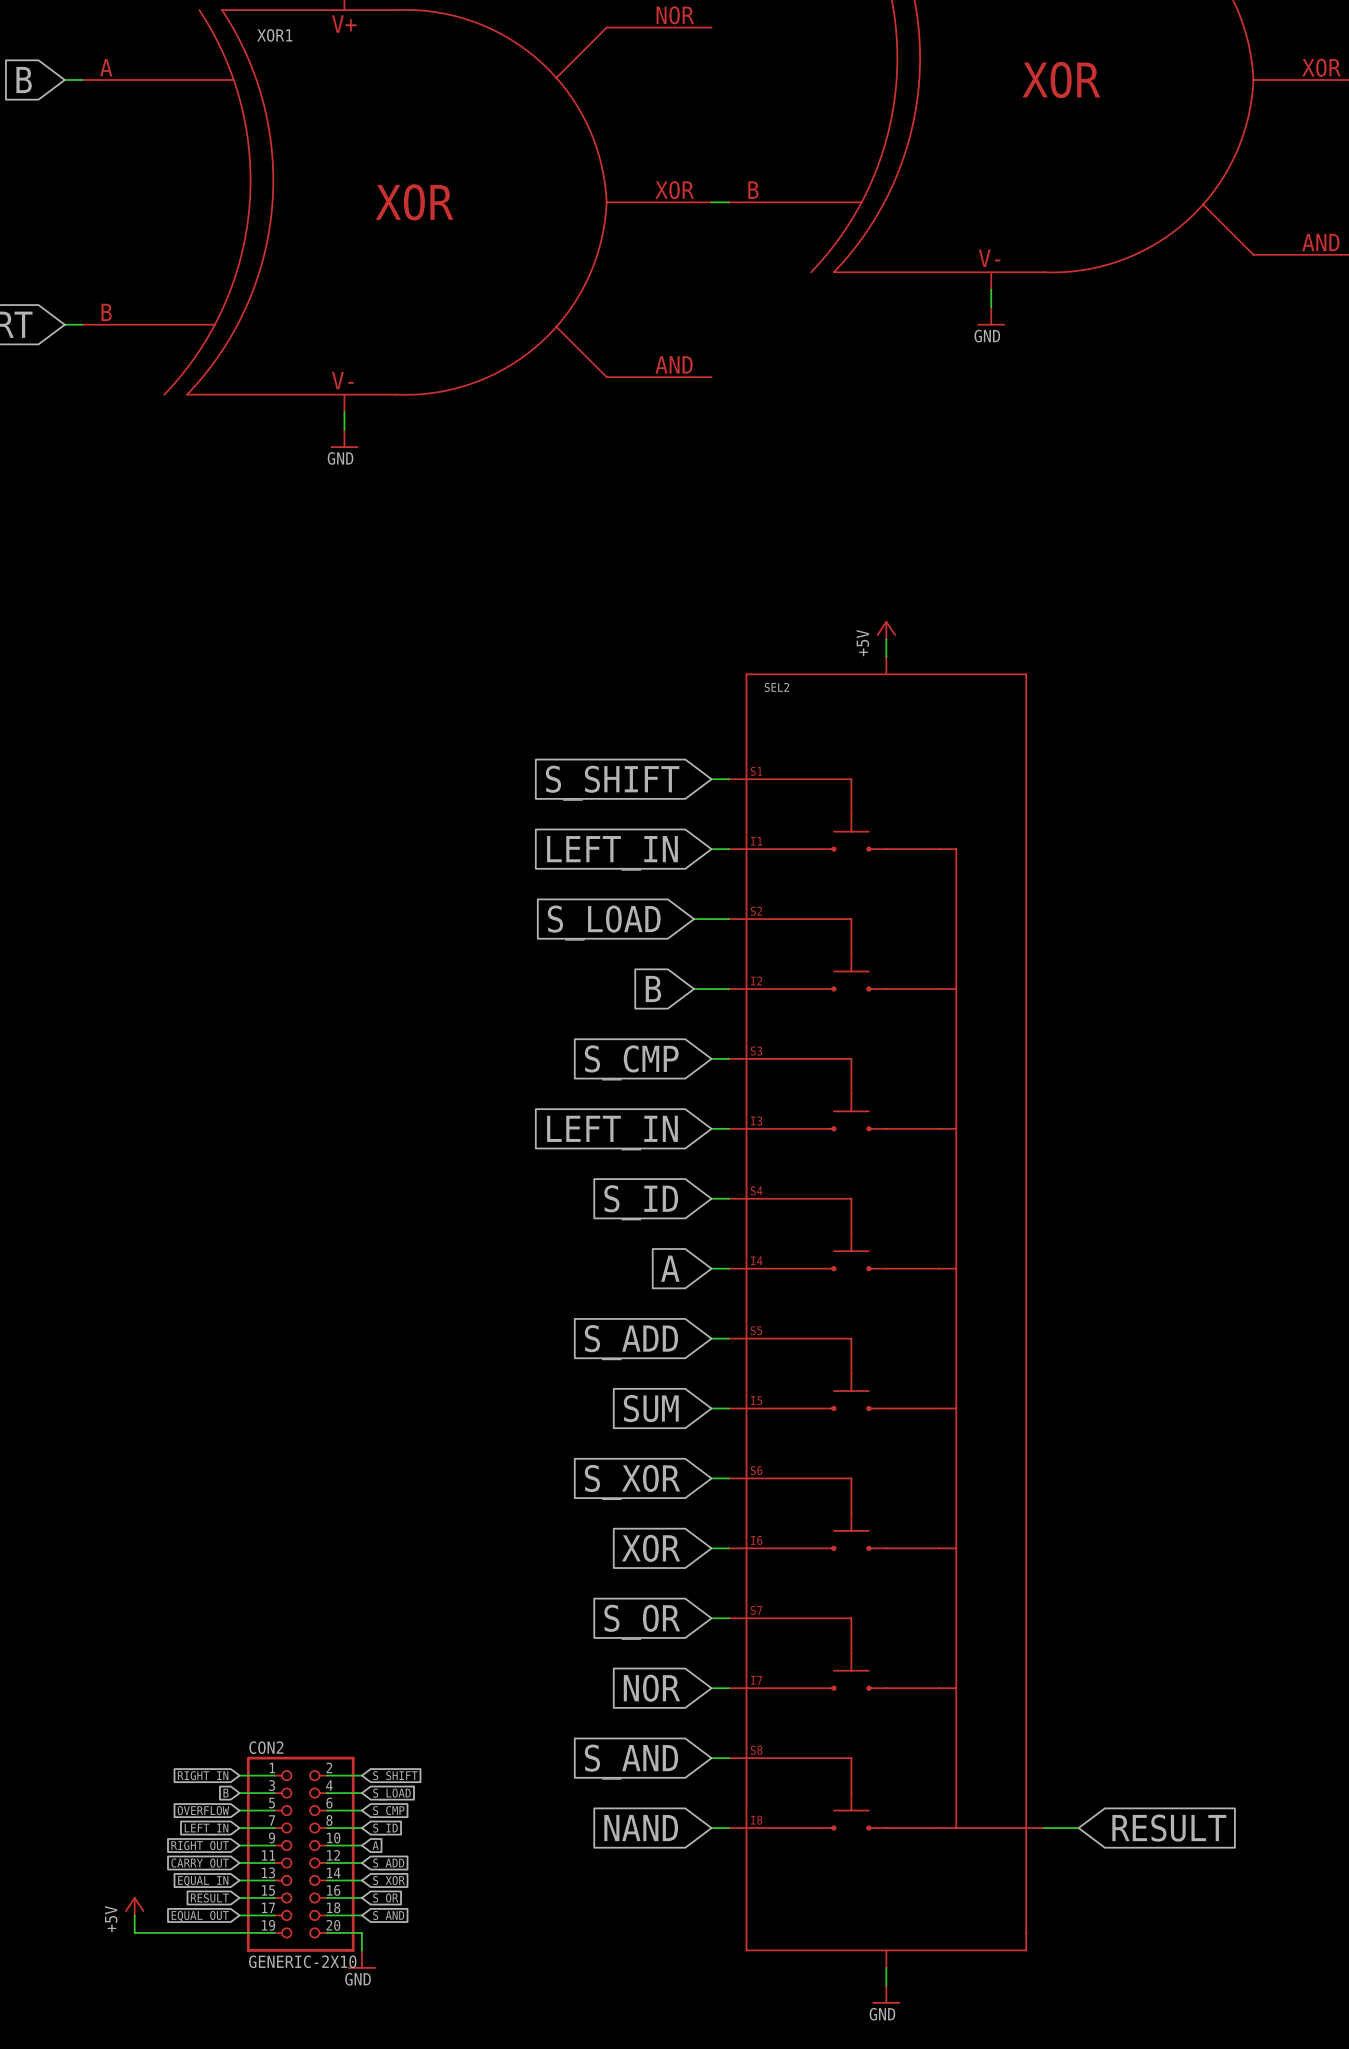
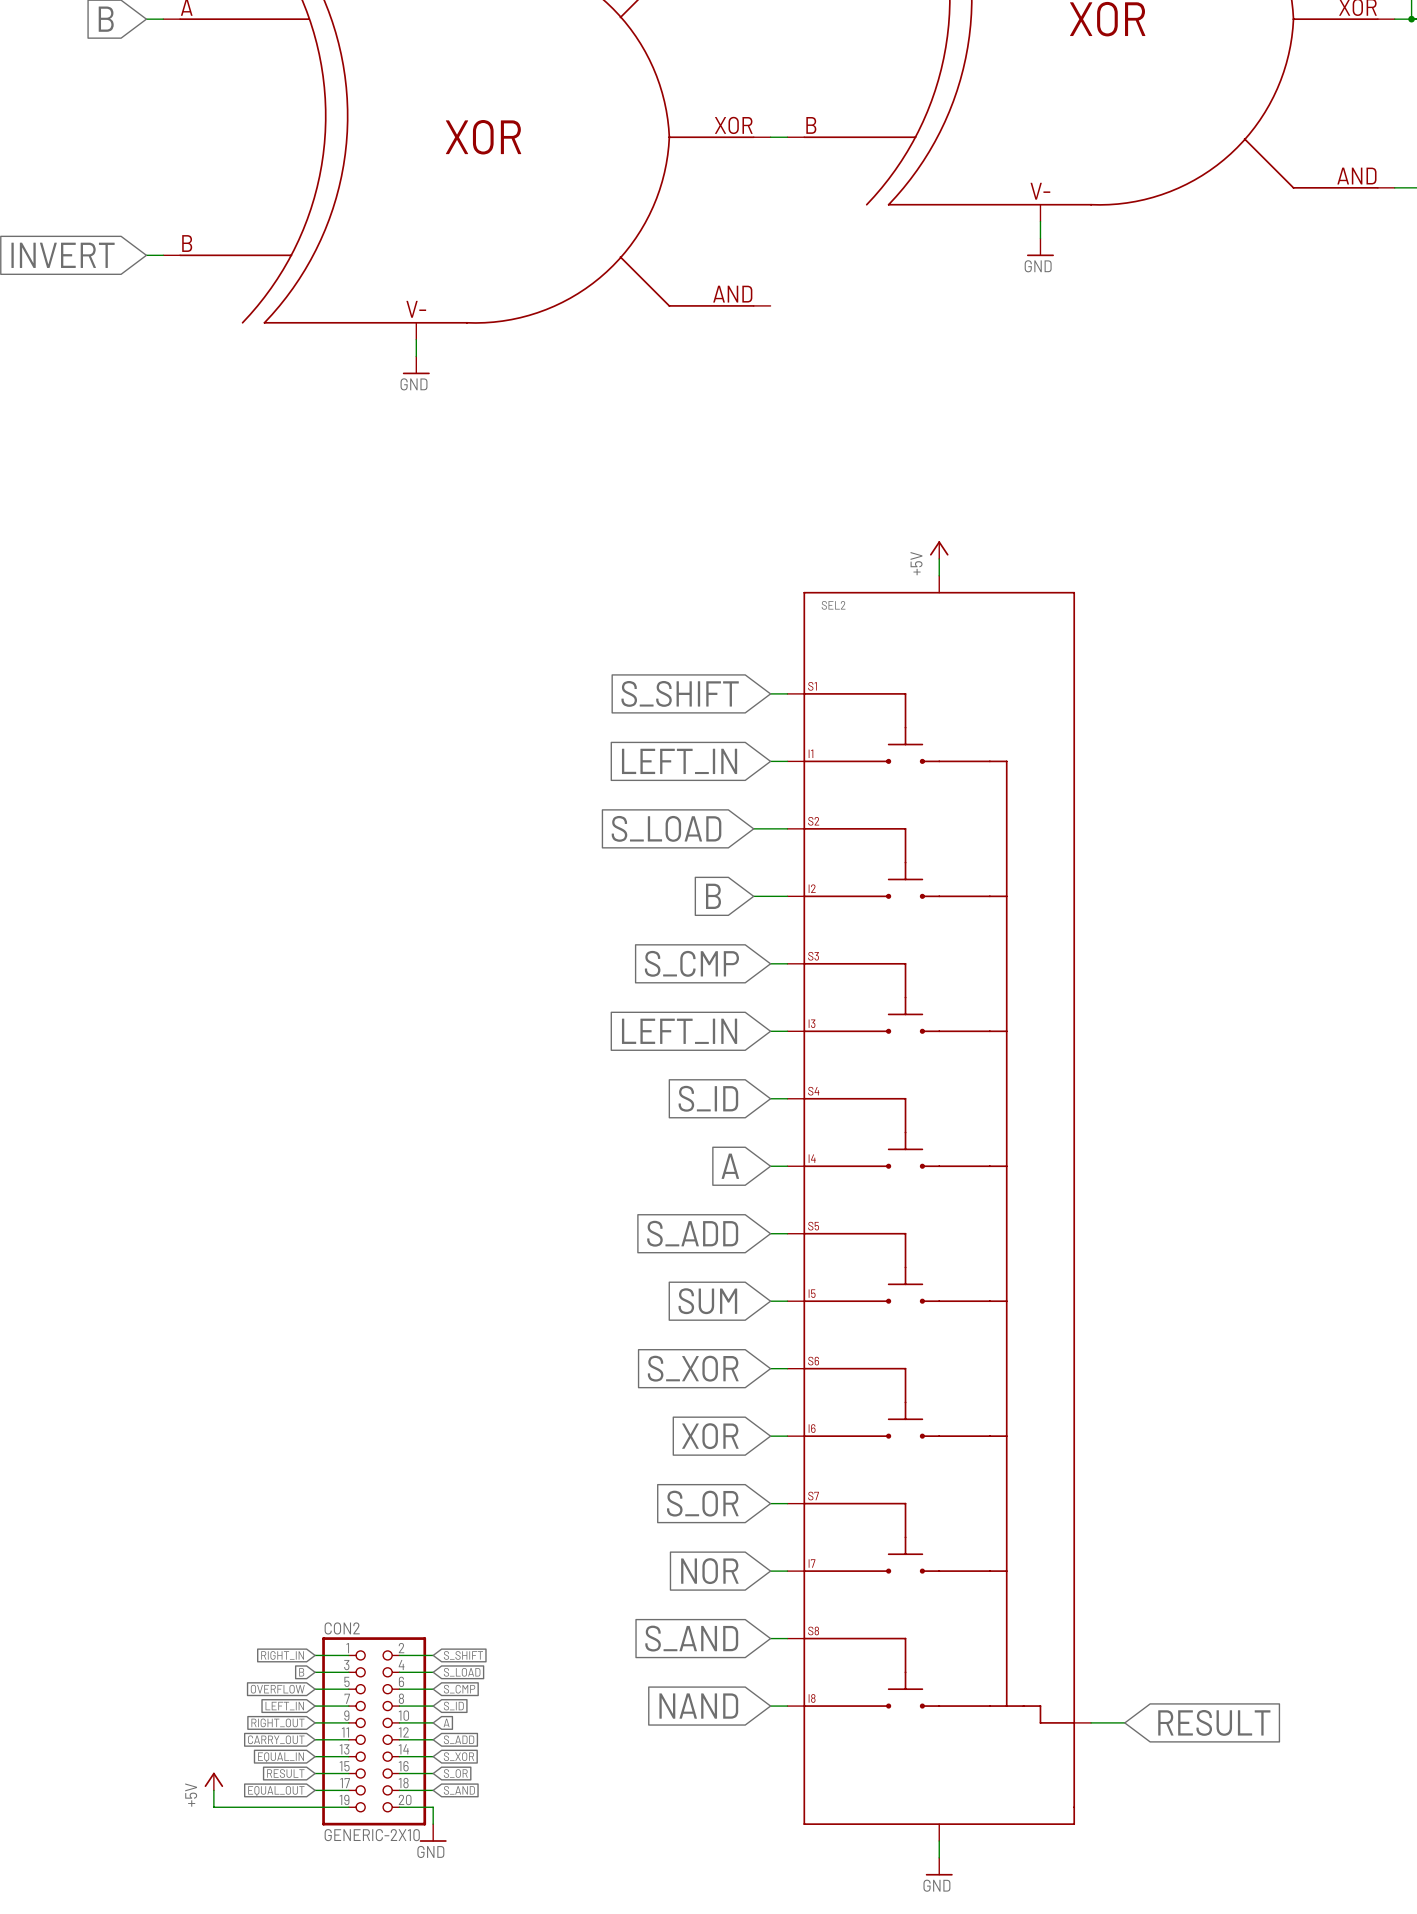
SEL2 symbol: [729, 656, 1044, 1968] -> [787, 575, 1092, 1842]
wire: (1043, 1828) (1078, 1828) -> (1091, 1722) (1124, 1722)
global label position: RESULT (1169, 1828) -> RESULT (1214, 1722)

